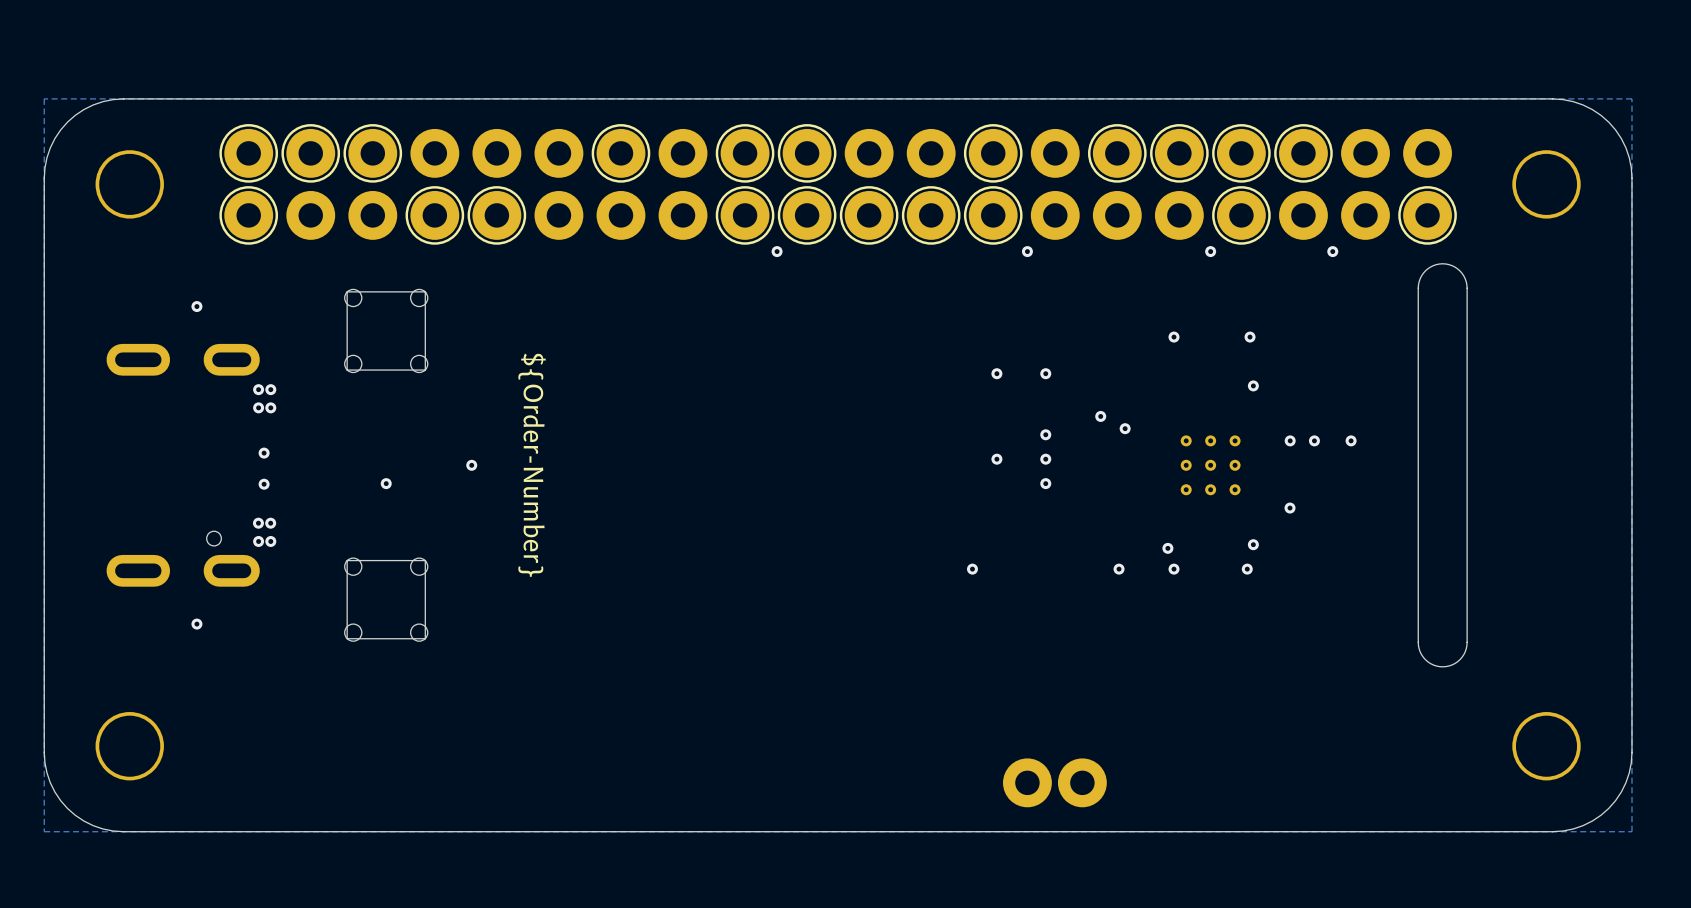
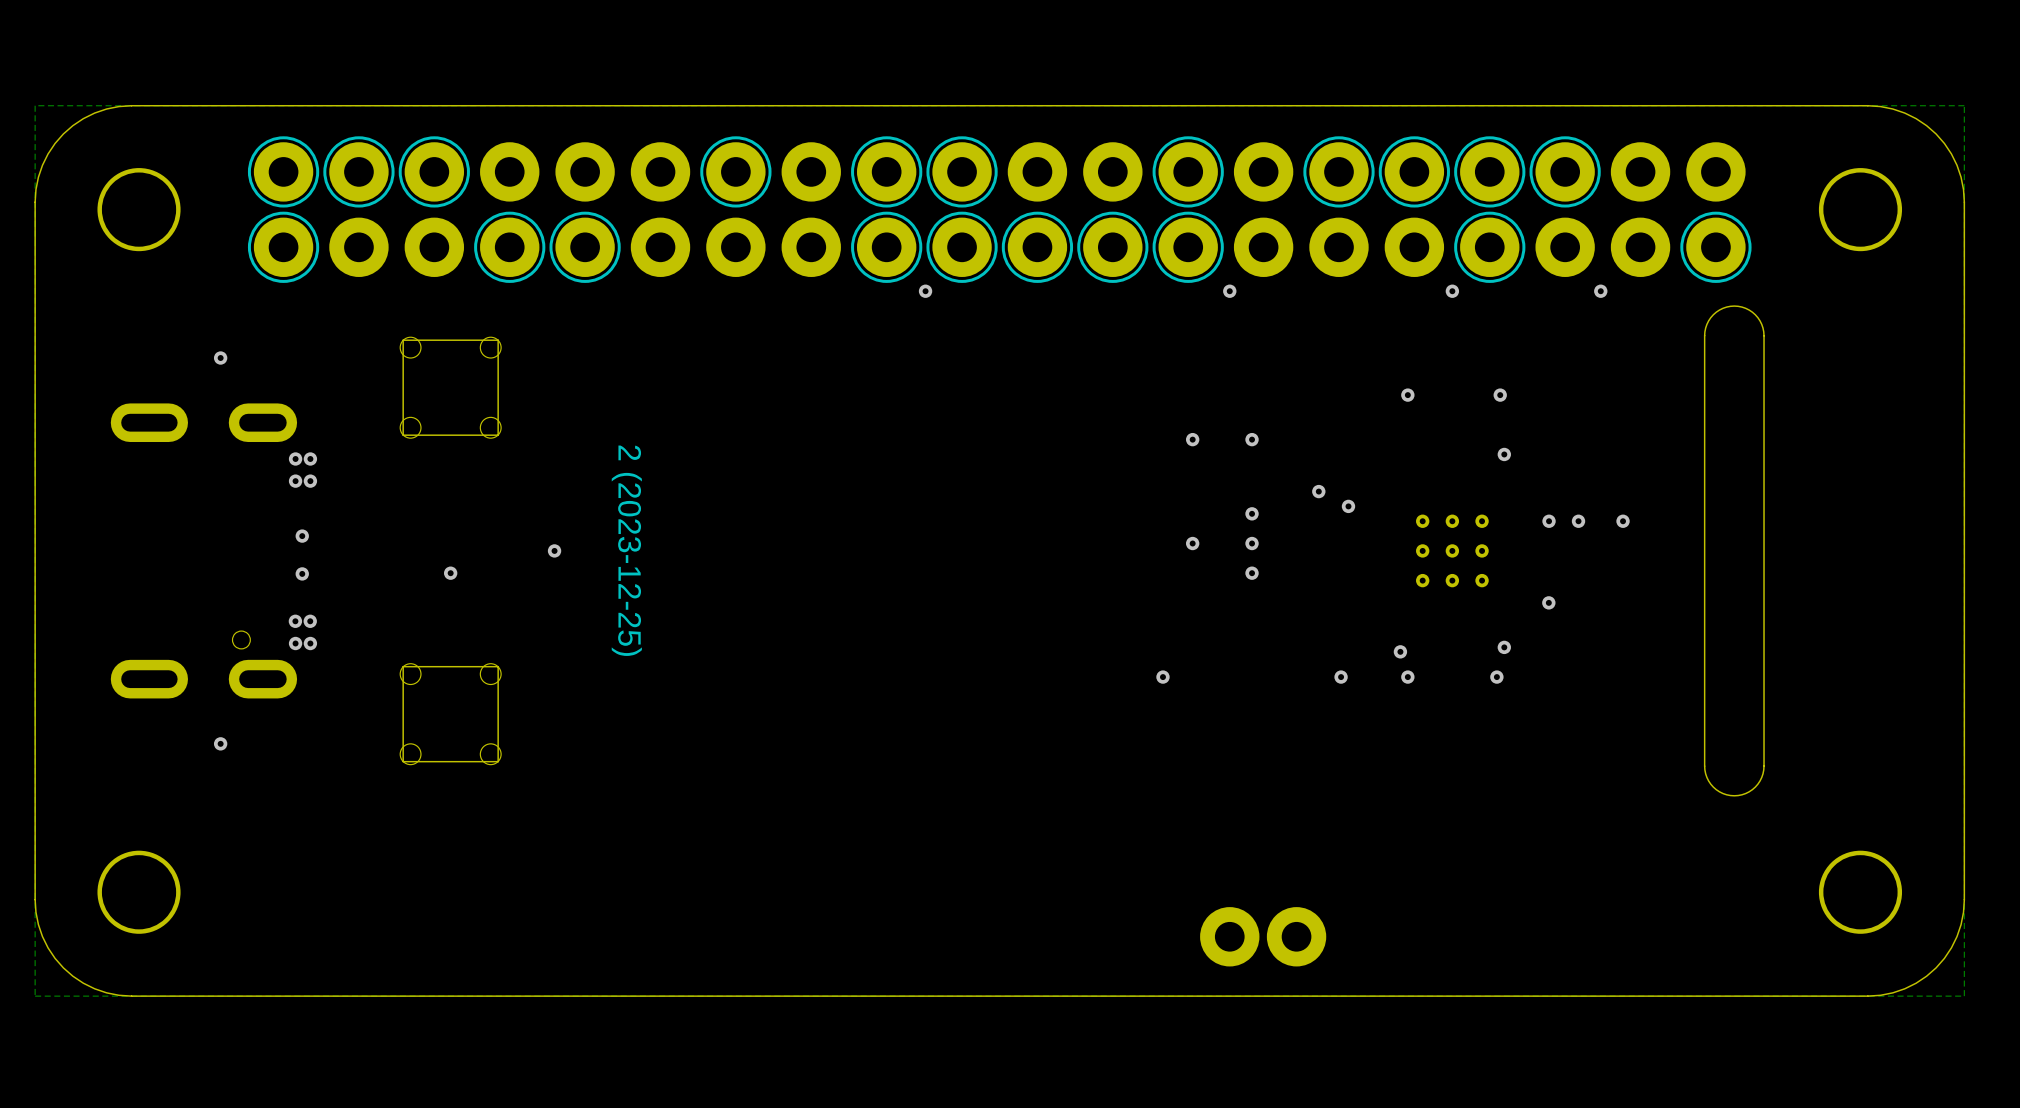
drawing shape: [518, 353, 546, 577] -> [611, 445, 642, 656]

